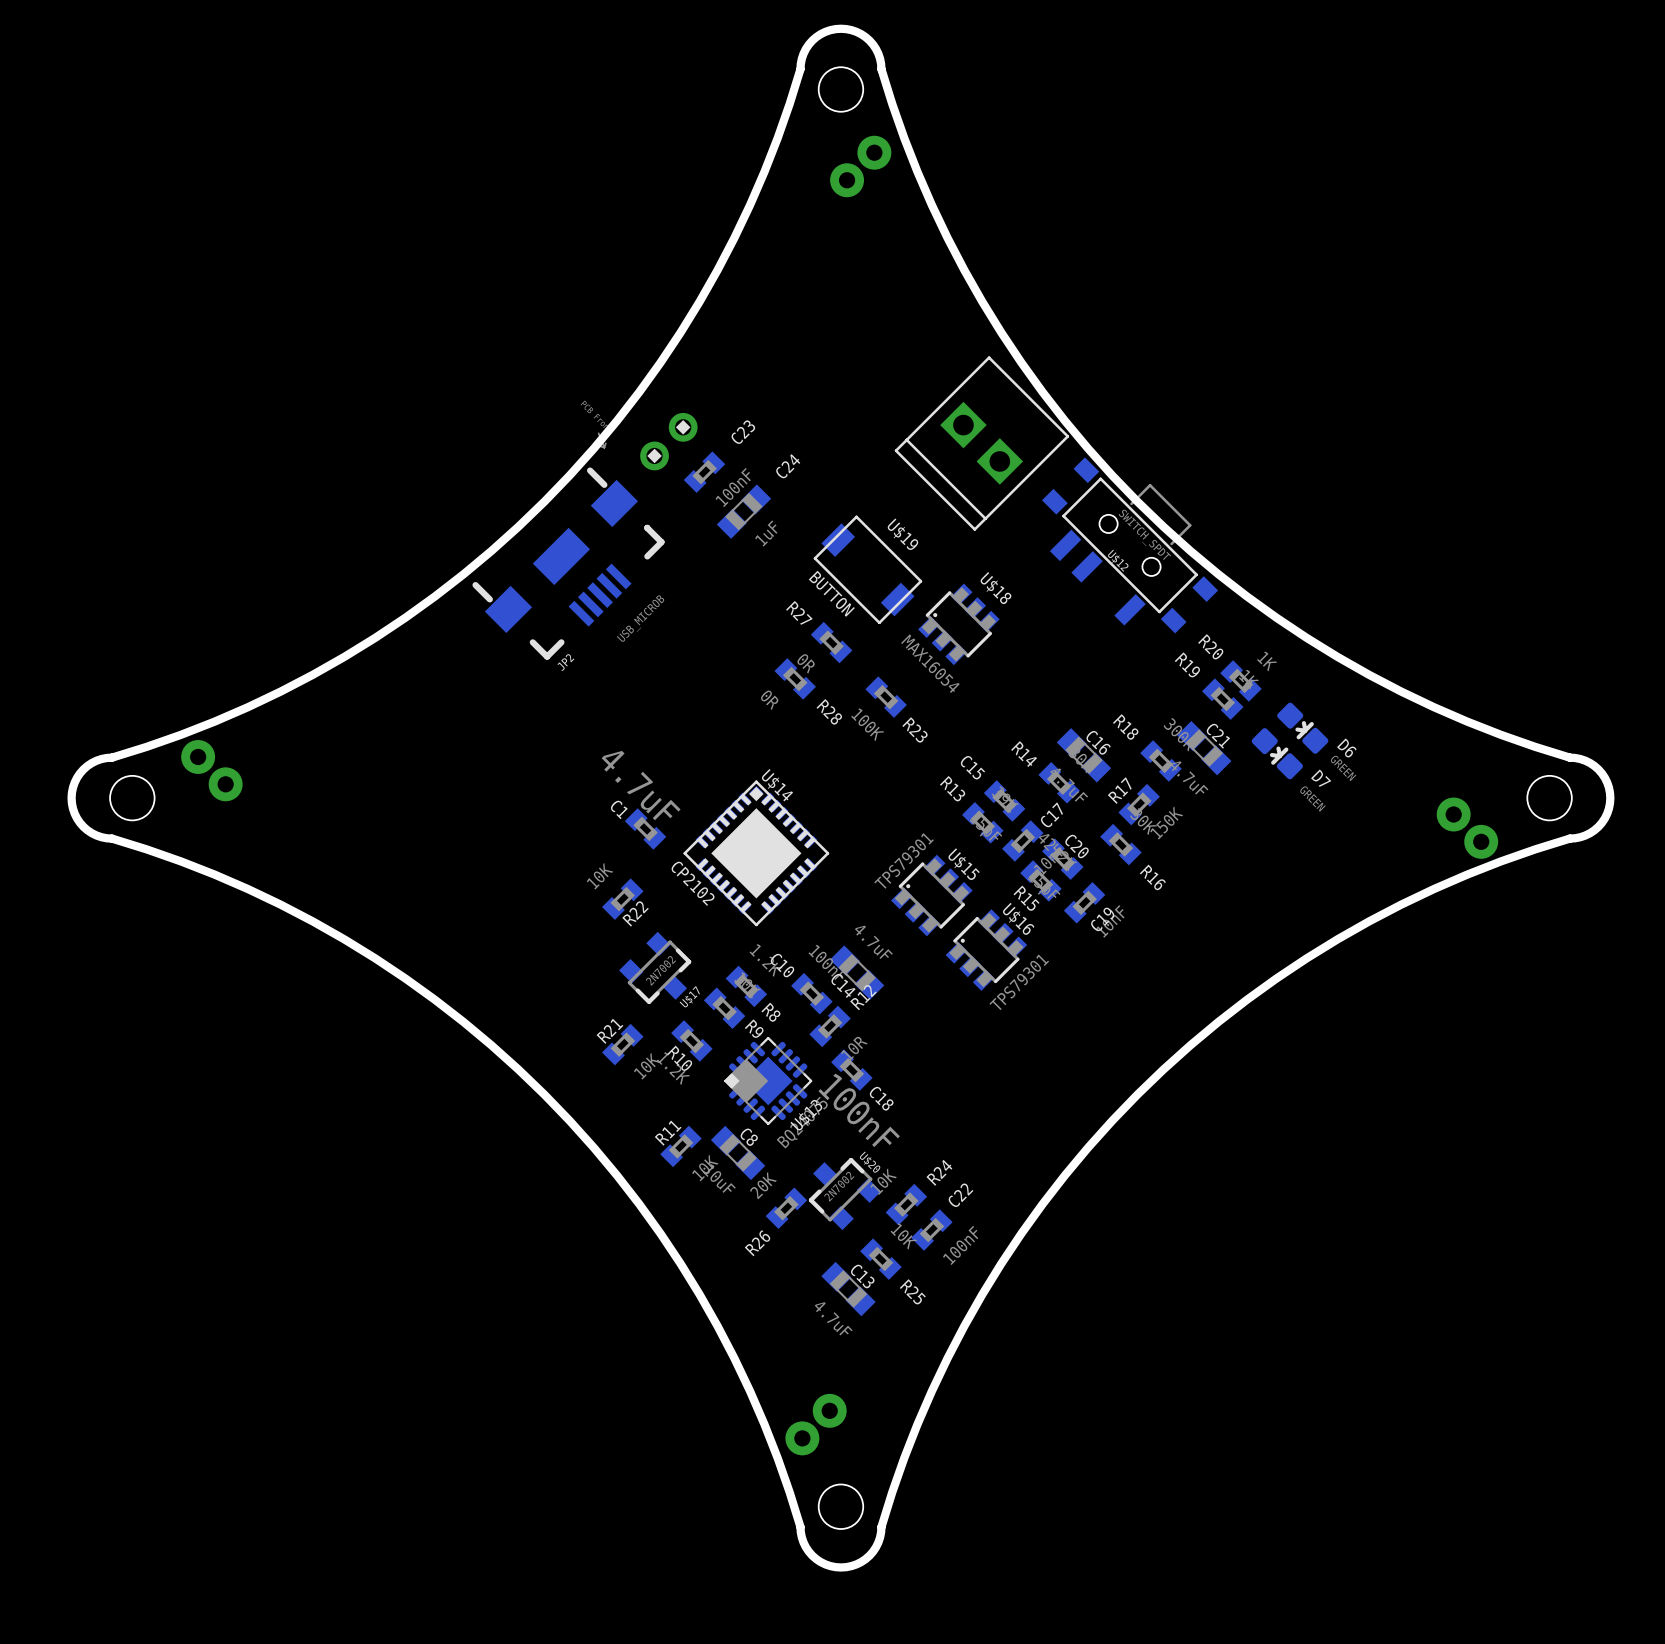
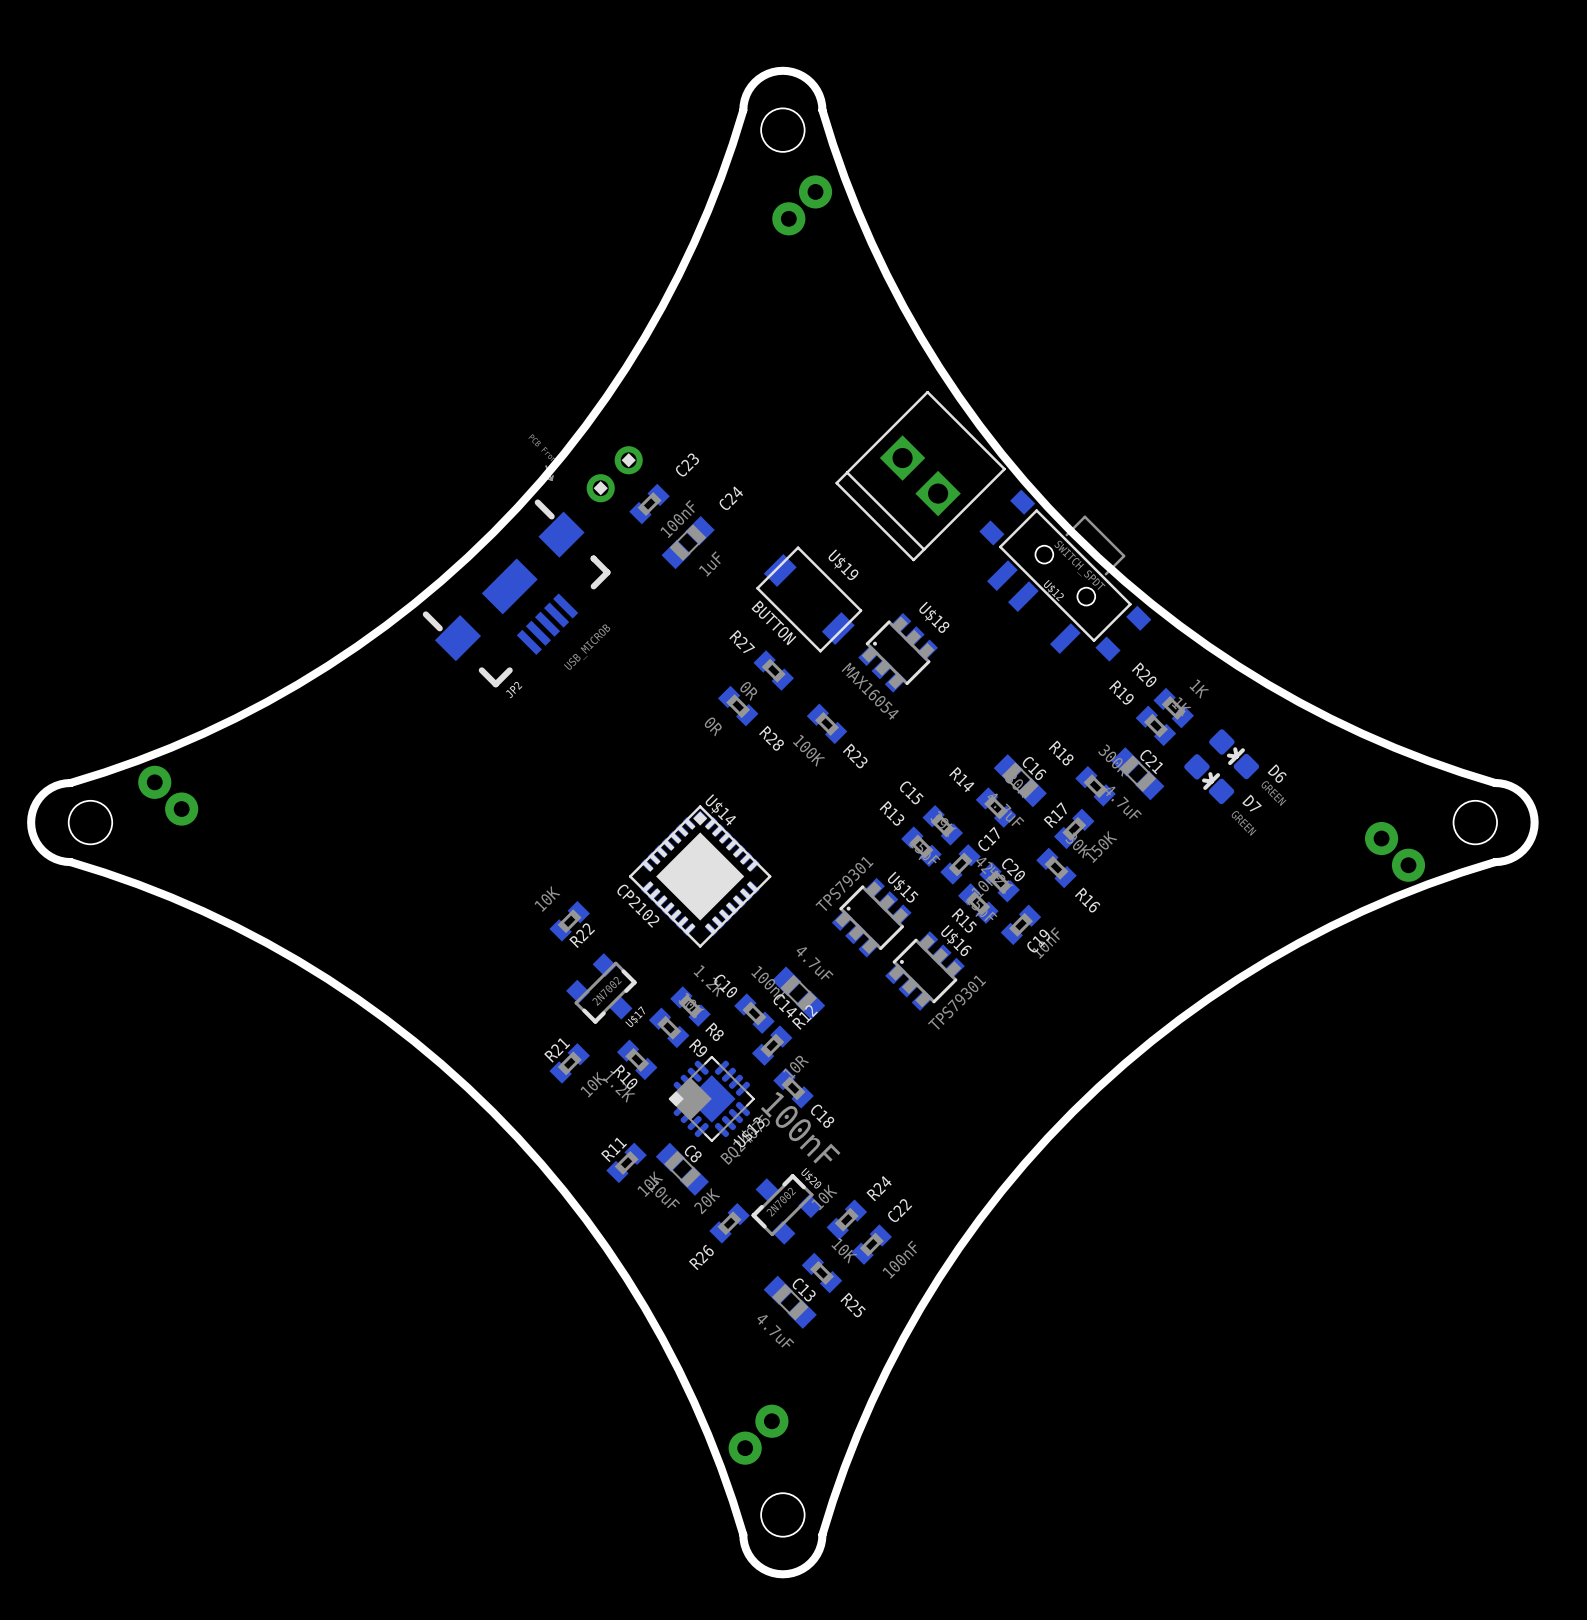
C1: 4.7uF (645, 828) -> none

